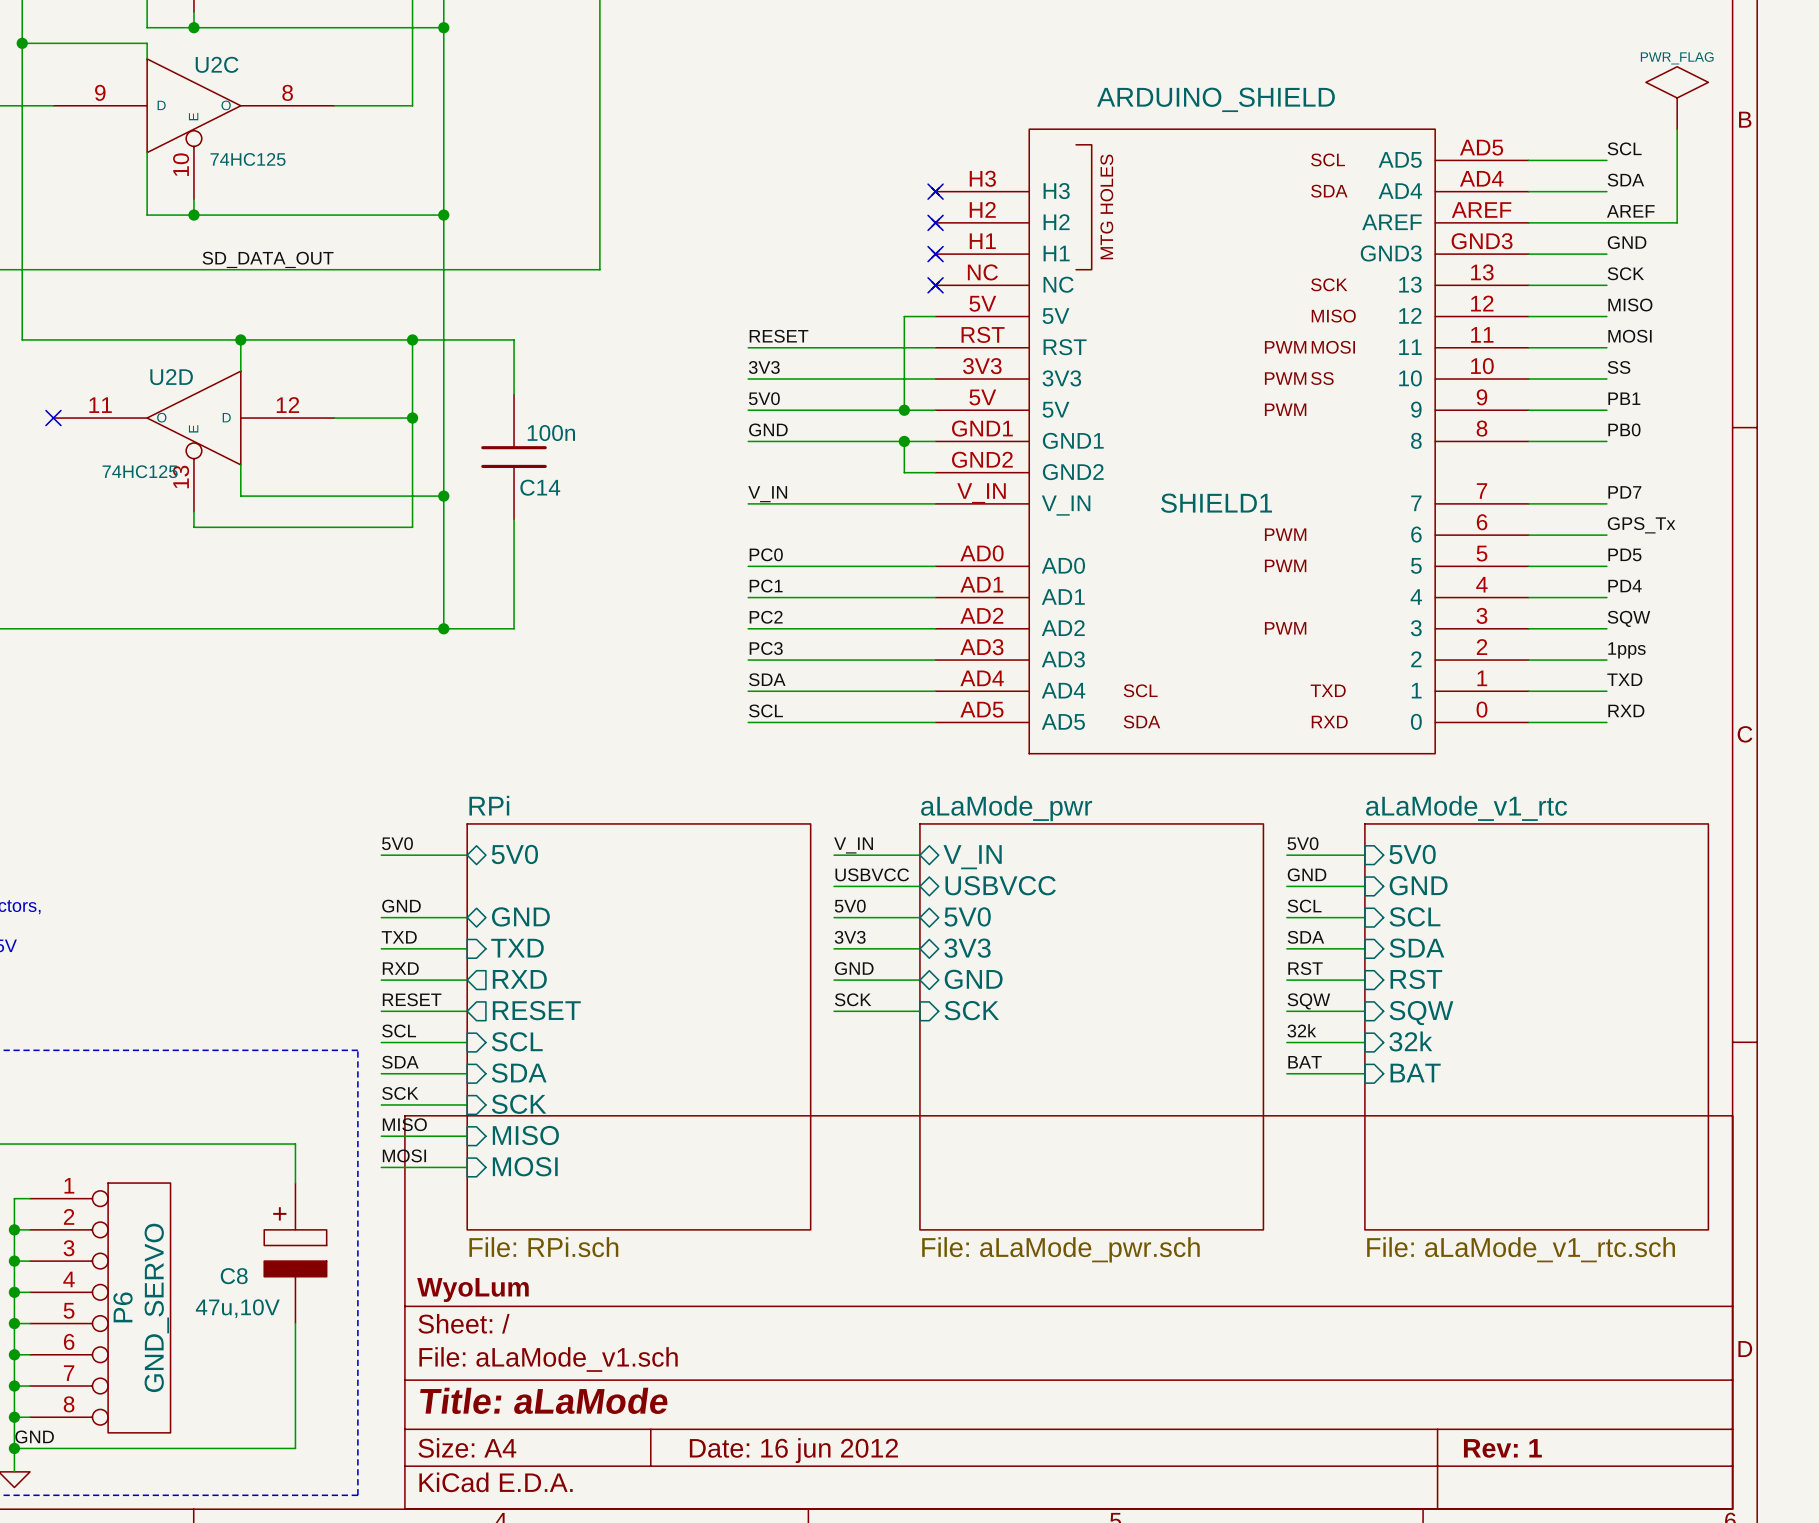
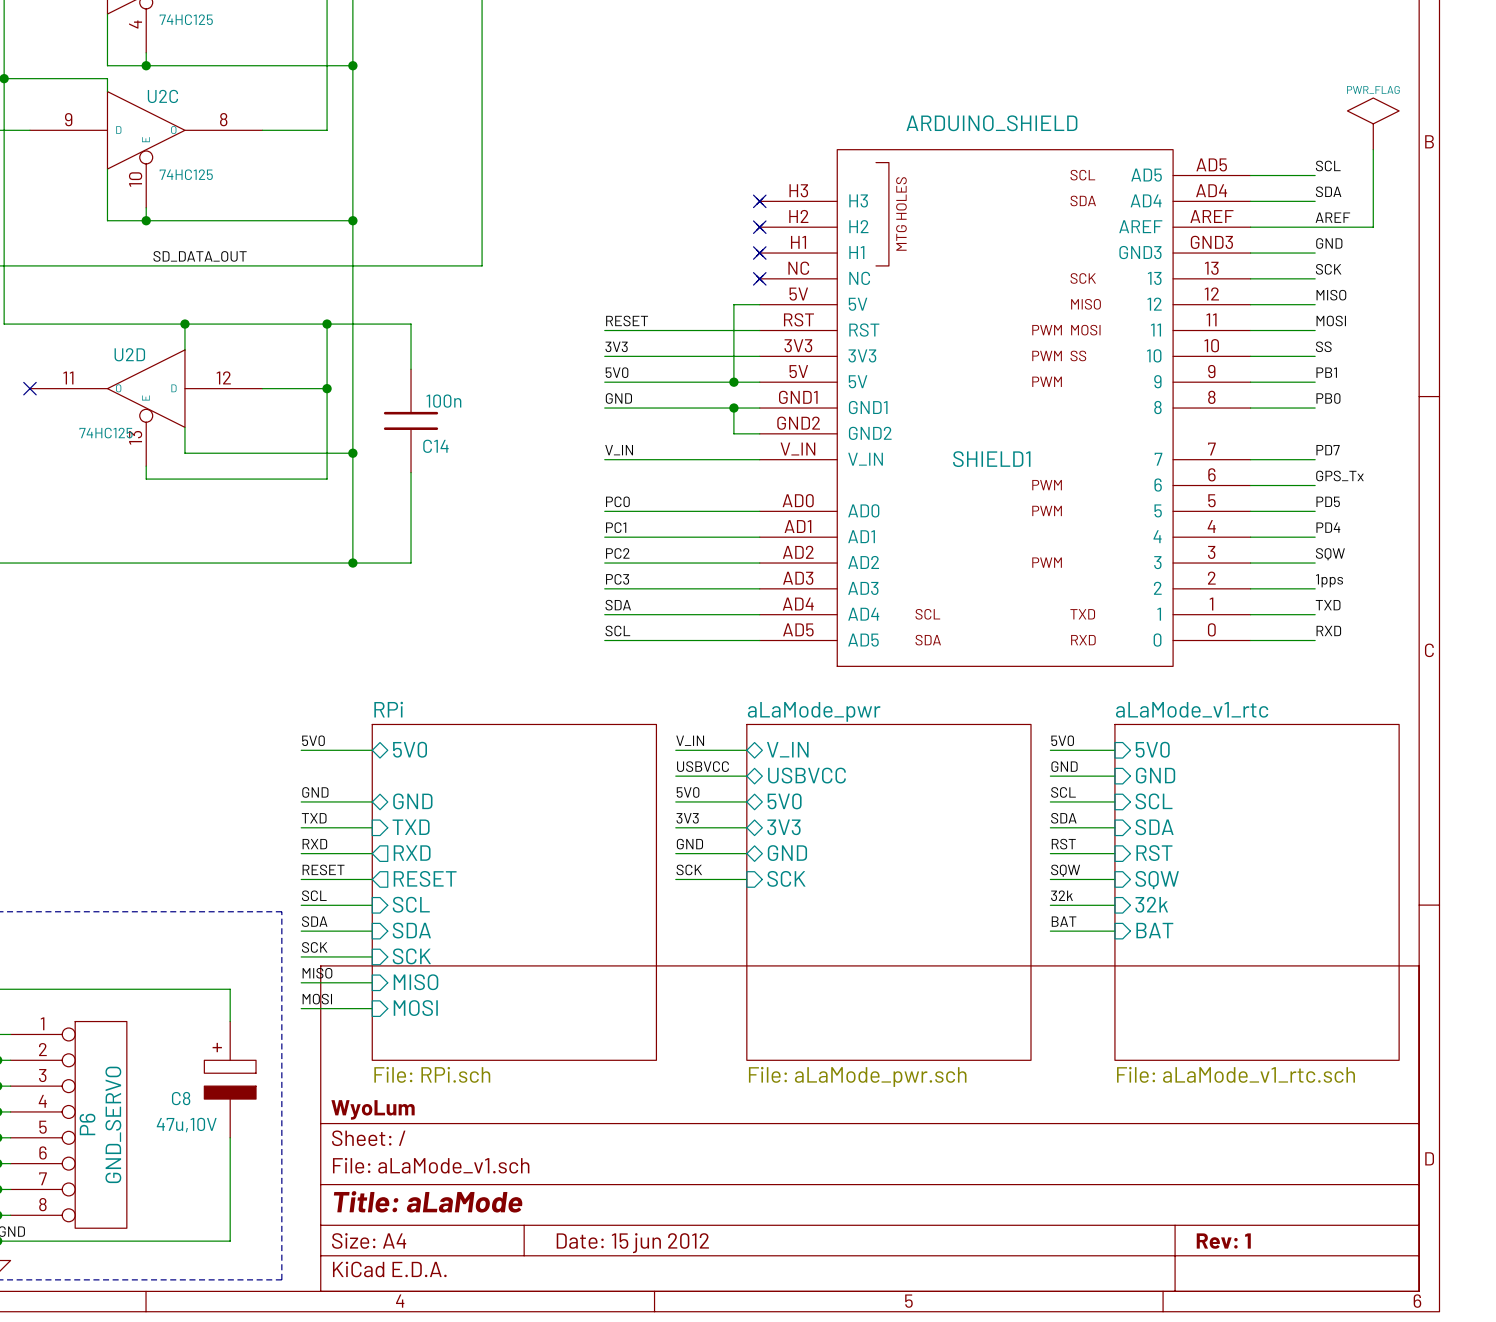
title block: Date: 16 jun 2012 (793, 1450) -> Date: 15 jun 2012 (632, 1243)

